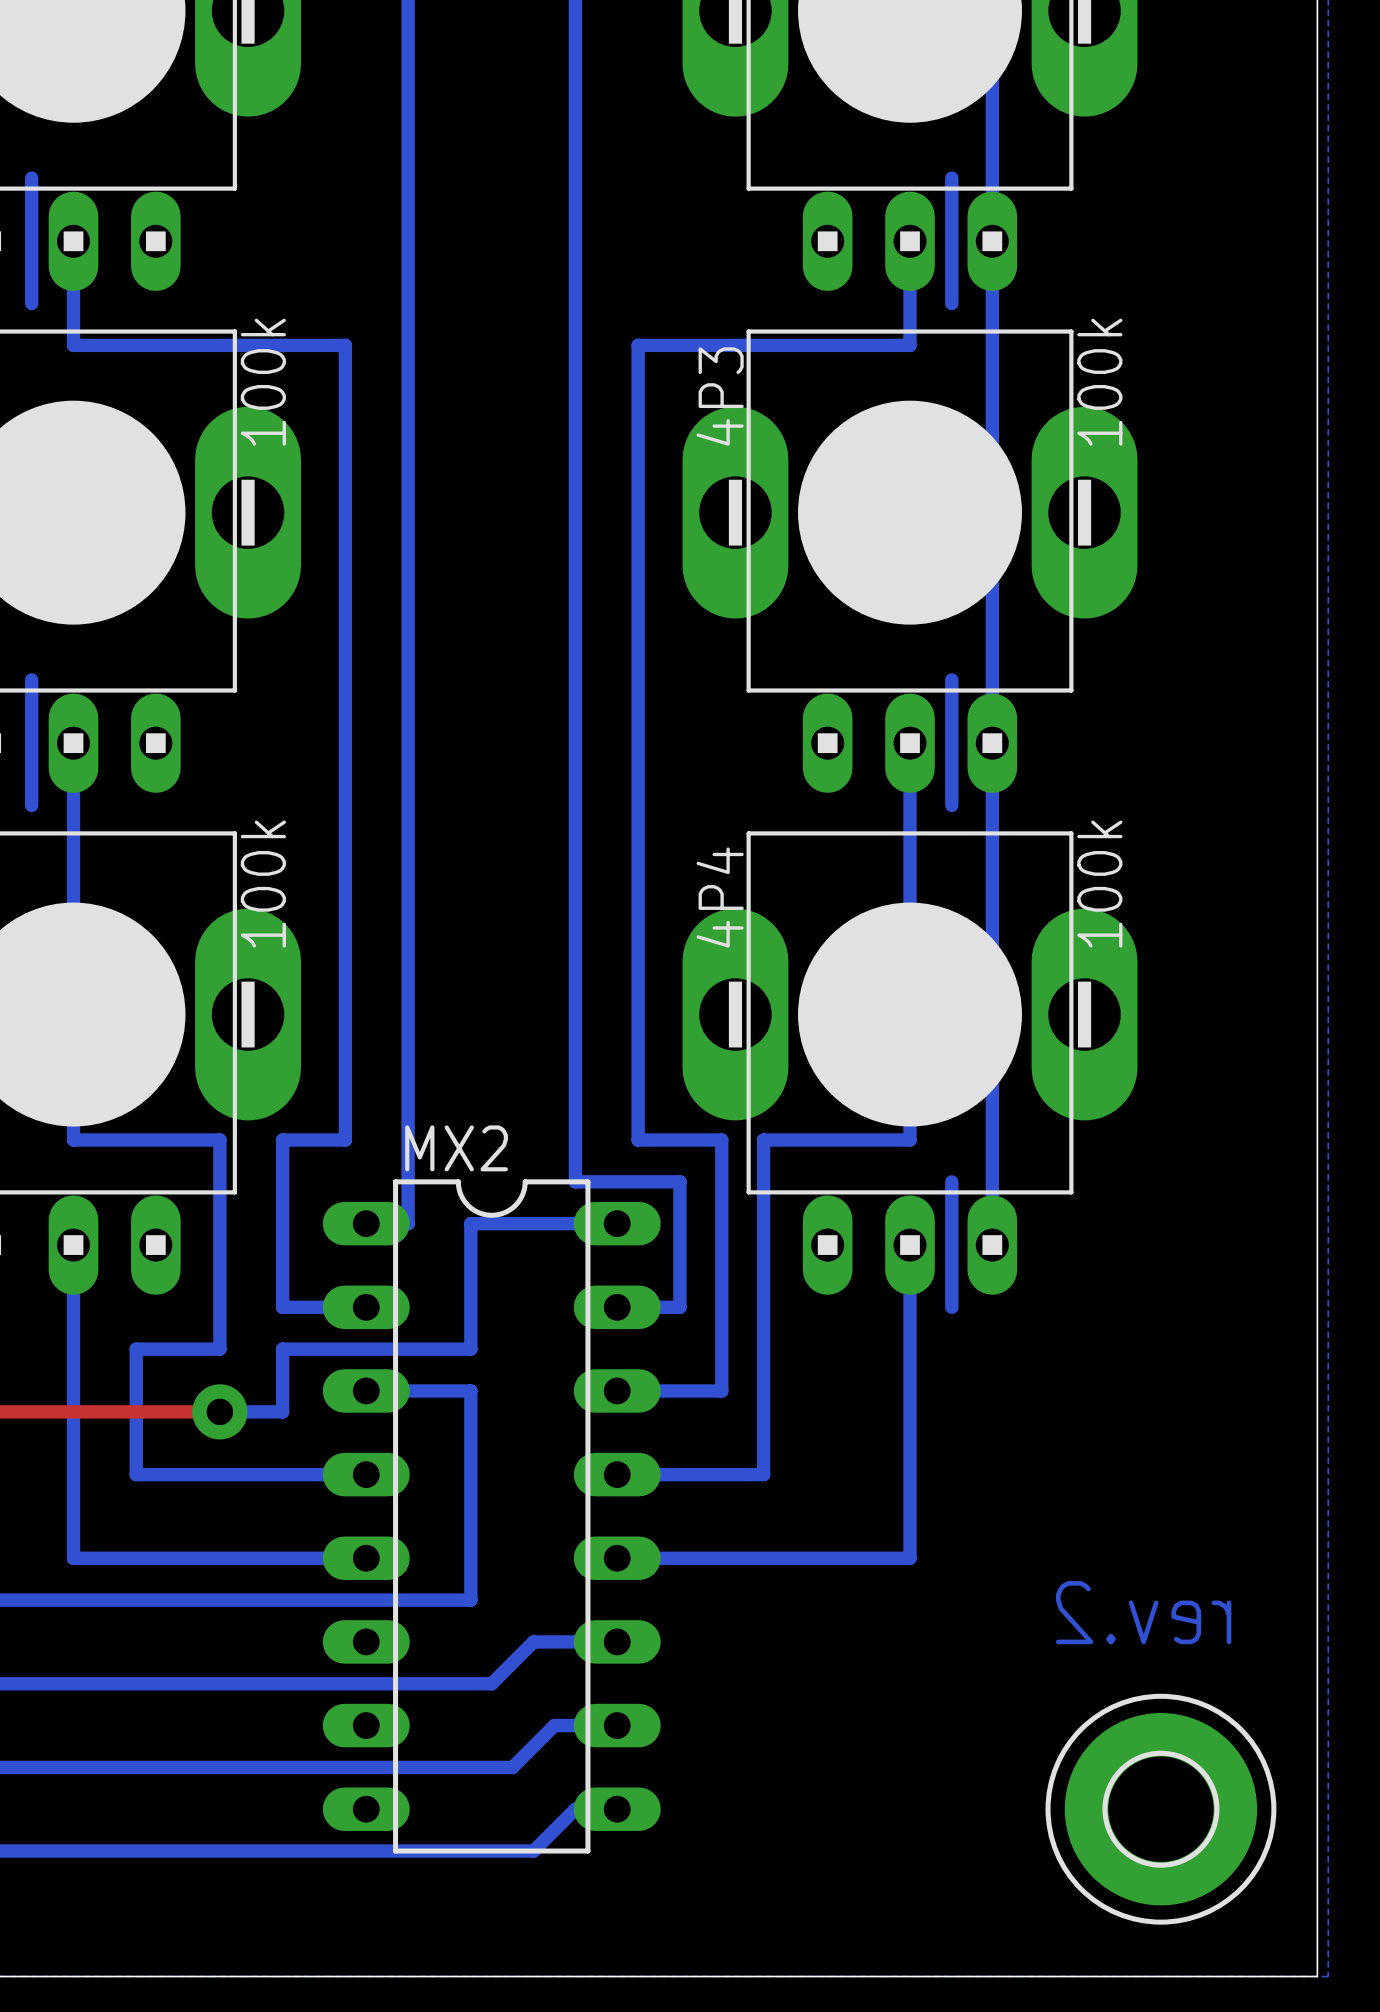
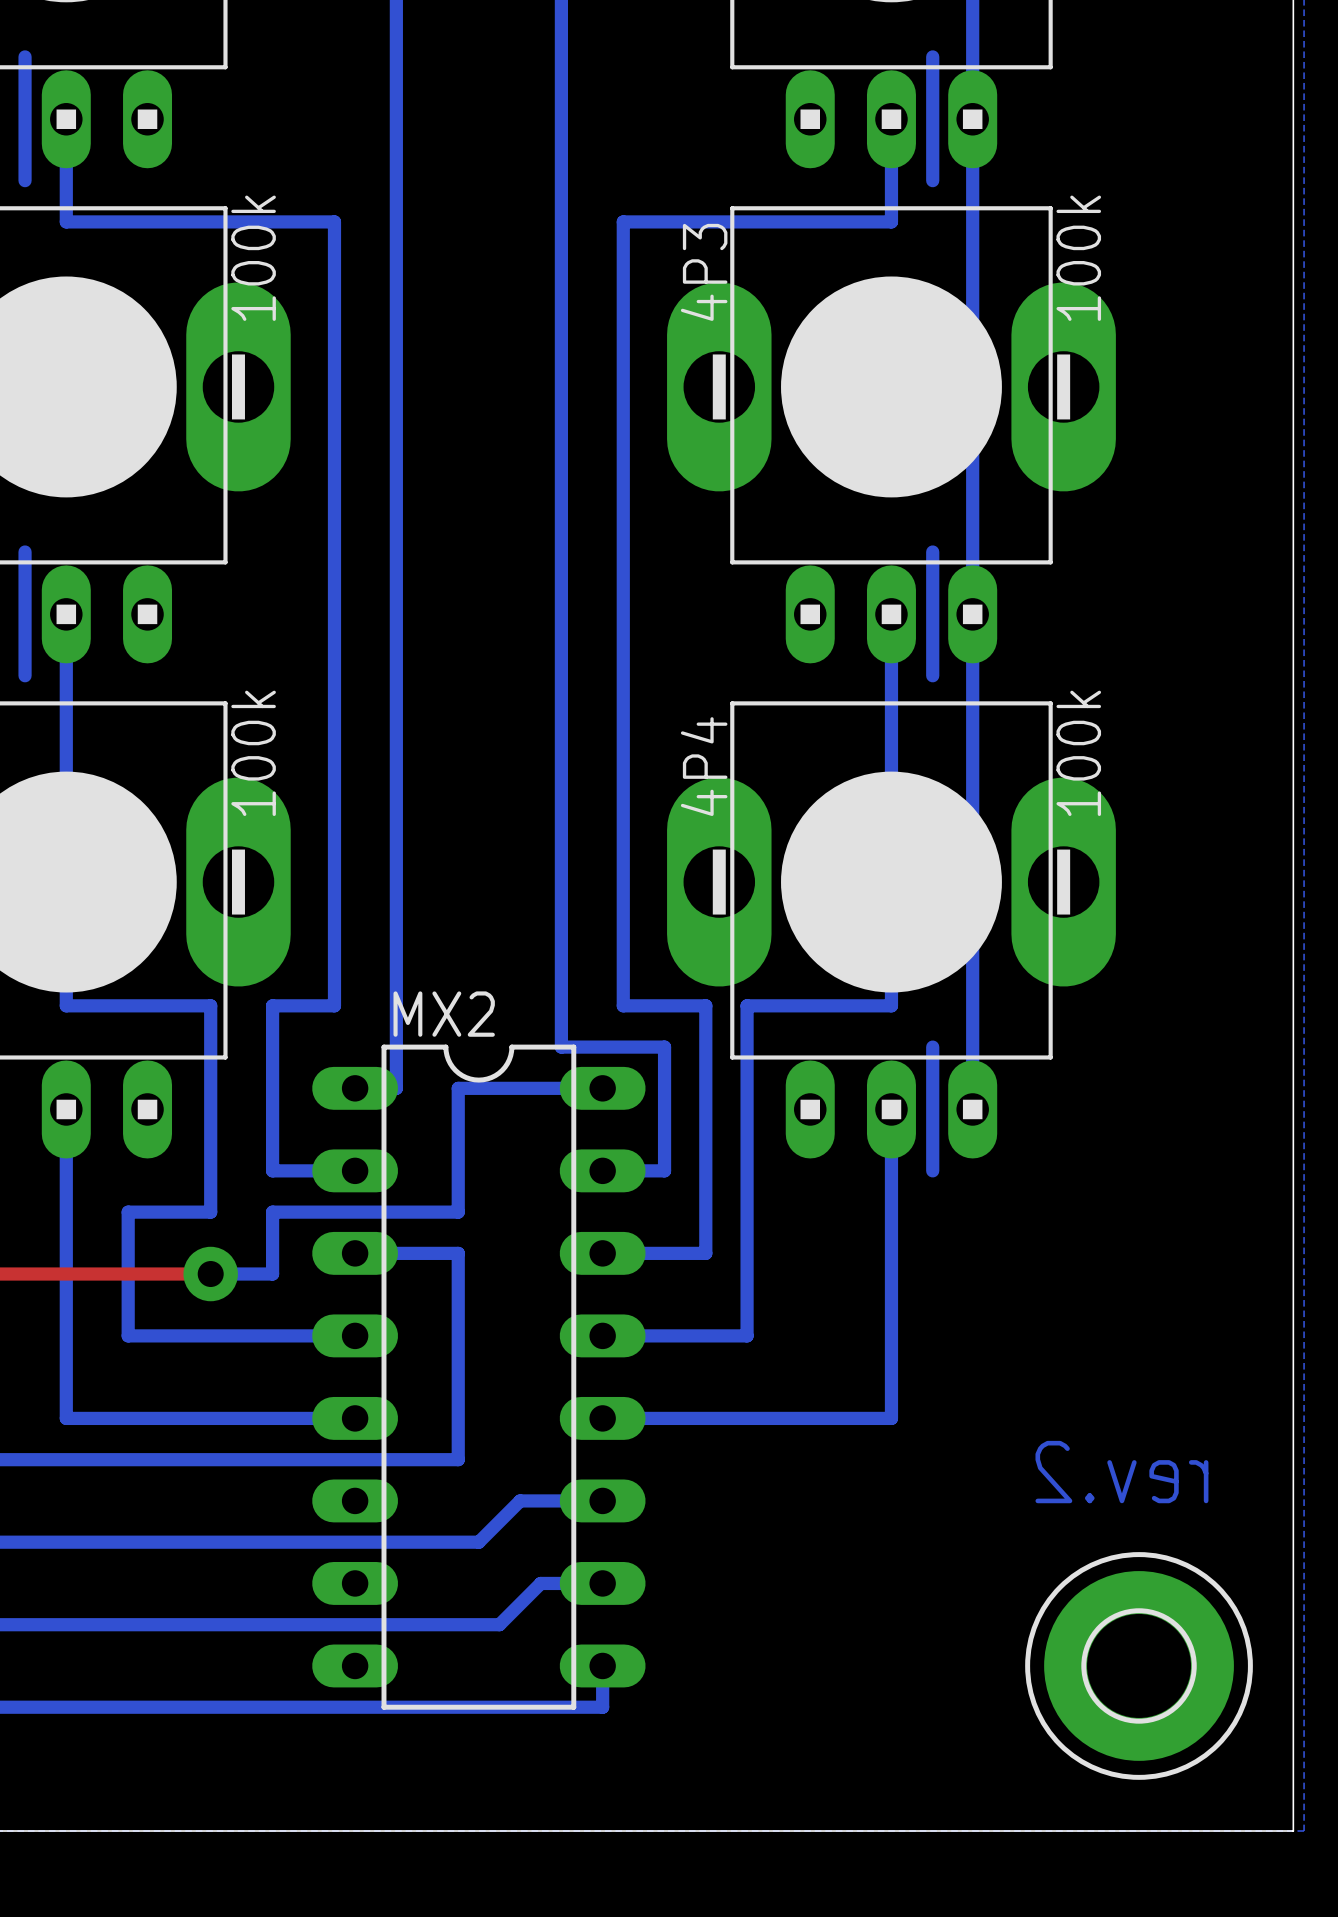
bottom track: (617, 1809) (575, 1809) (533, 1851) -> (602, 1665) (602, 1707) (520, 1707)

